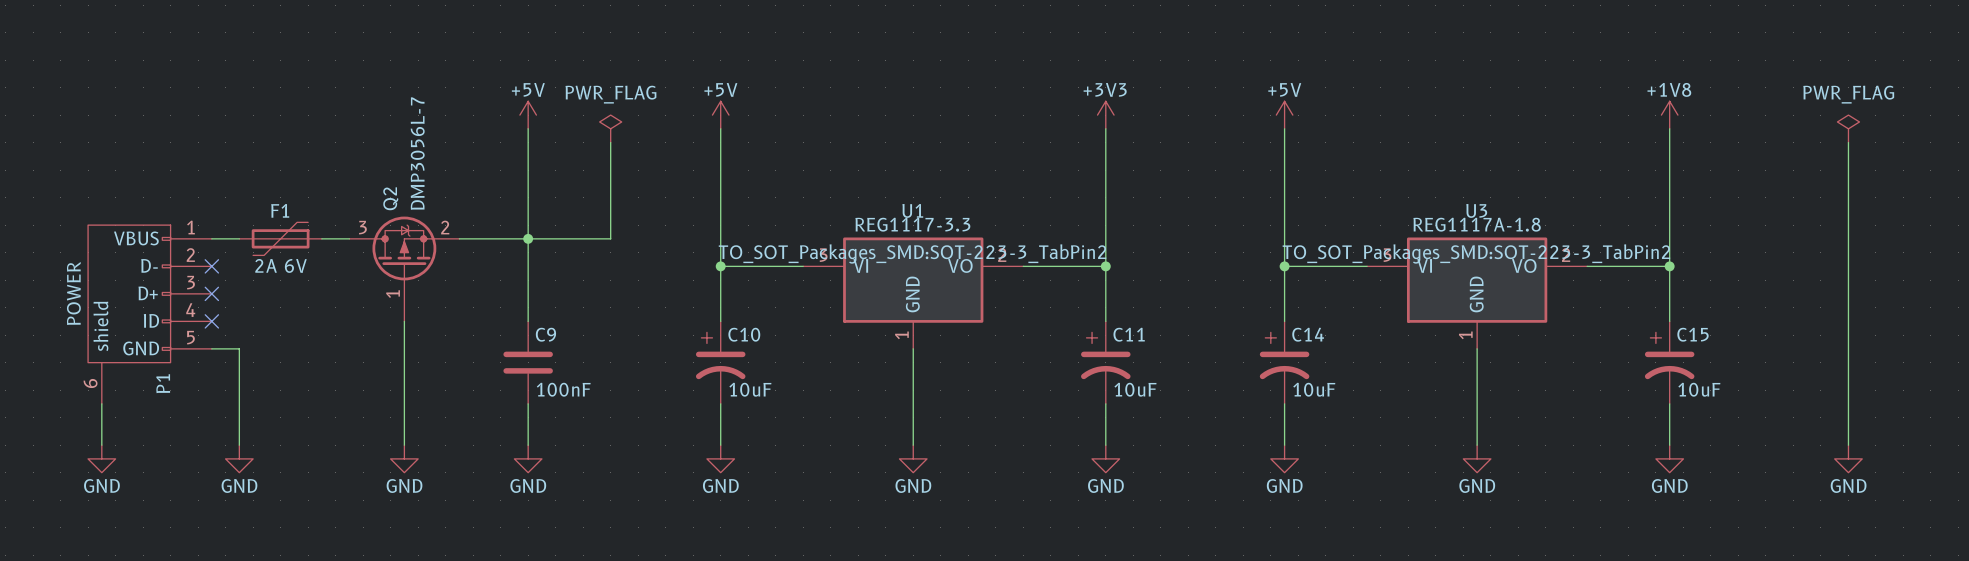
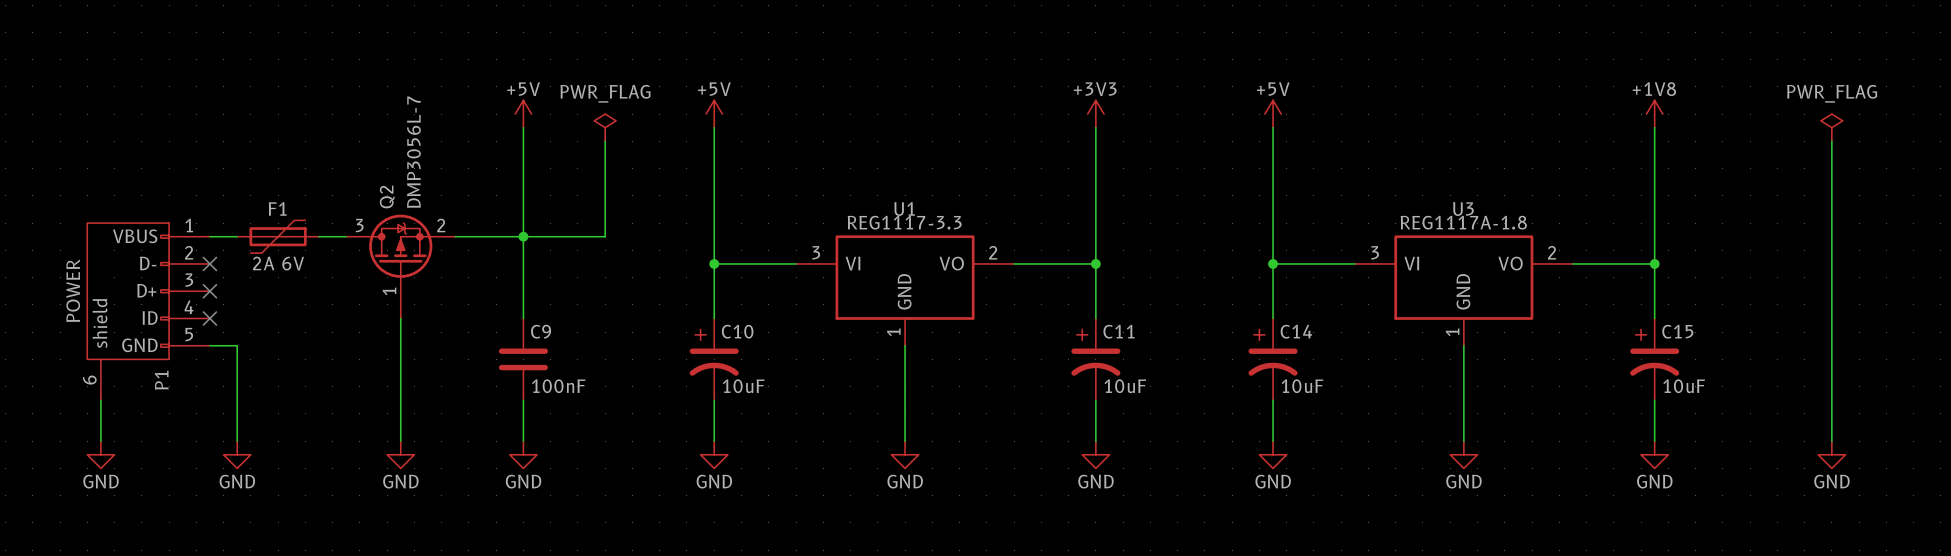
U1 text: TO_SOT_Packages_SMD:SOT-223-3_TabPin2 (912, 253) -> none
U3 text: TO_SOT_Packages_SMD:SOT-223-3_TabPin2 (1476, 253) -> none

